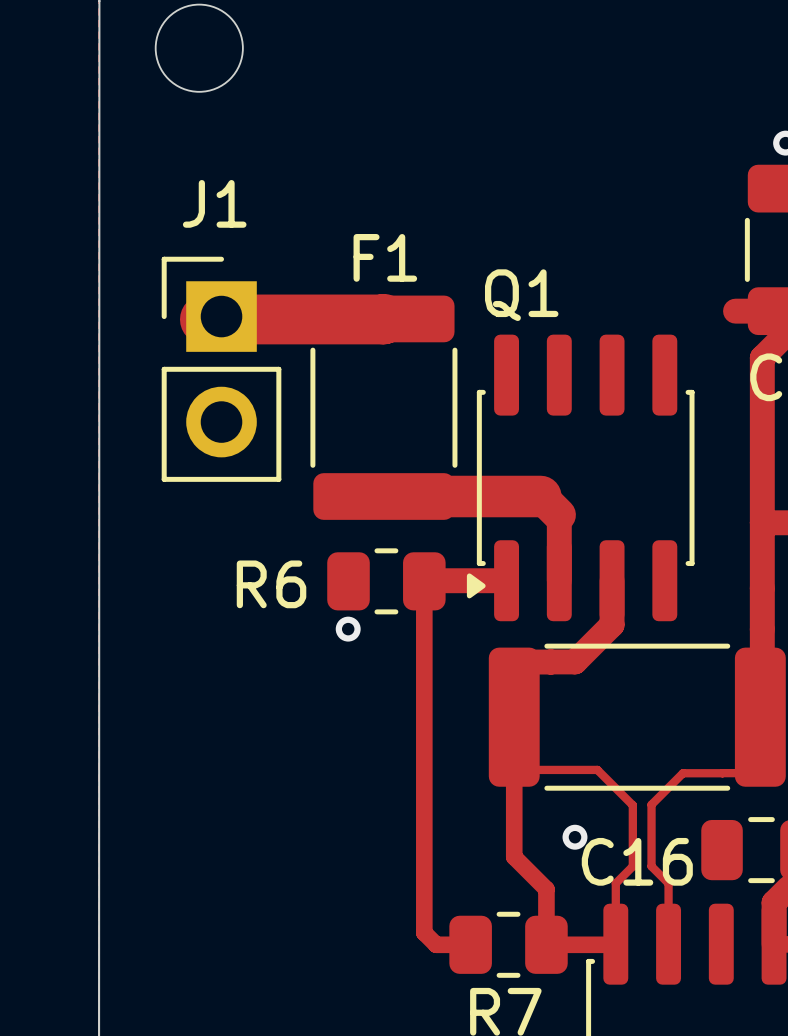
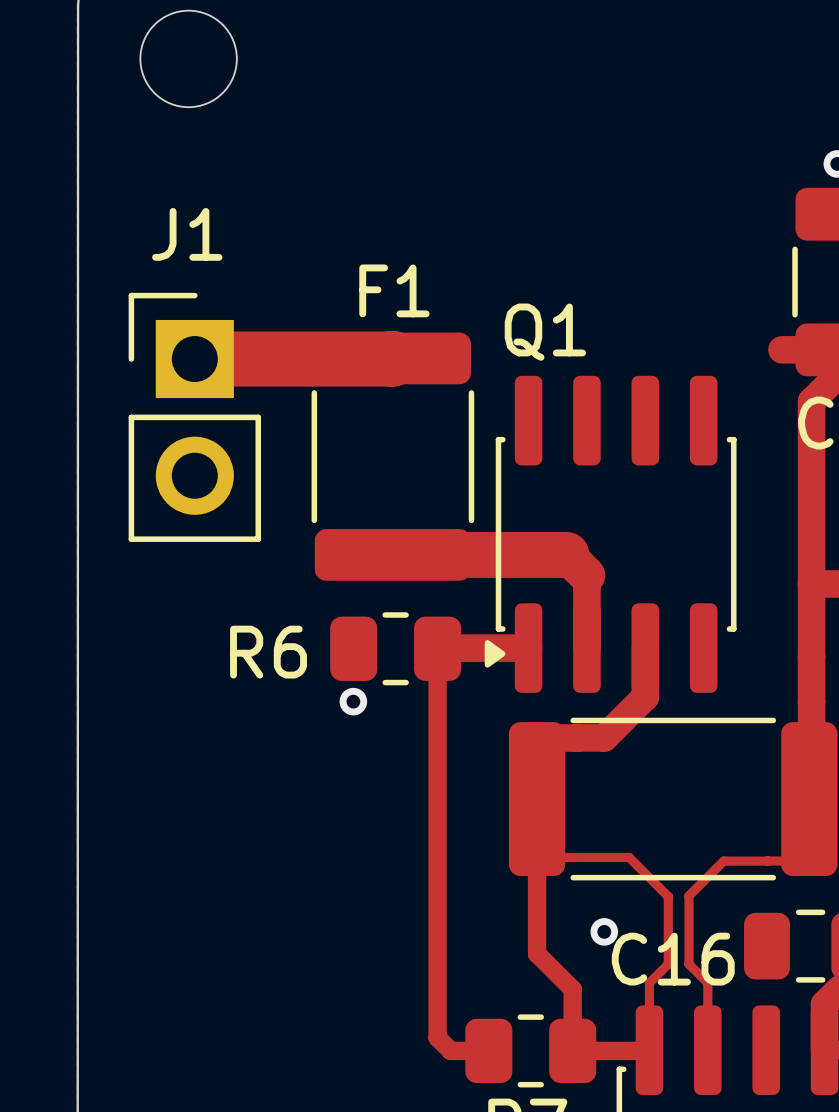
J1 position: (221, 369) -> (194, 417)

